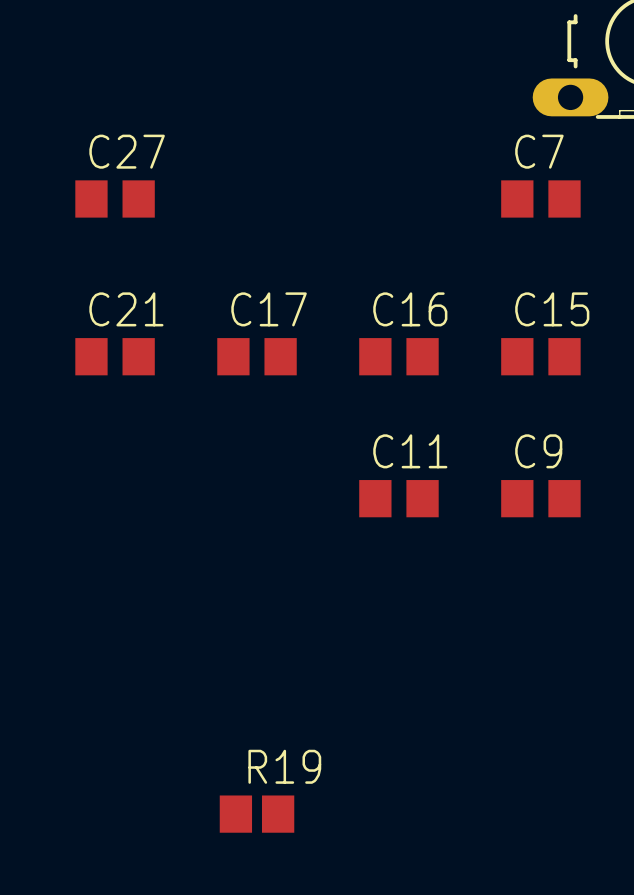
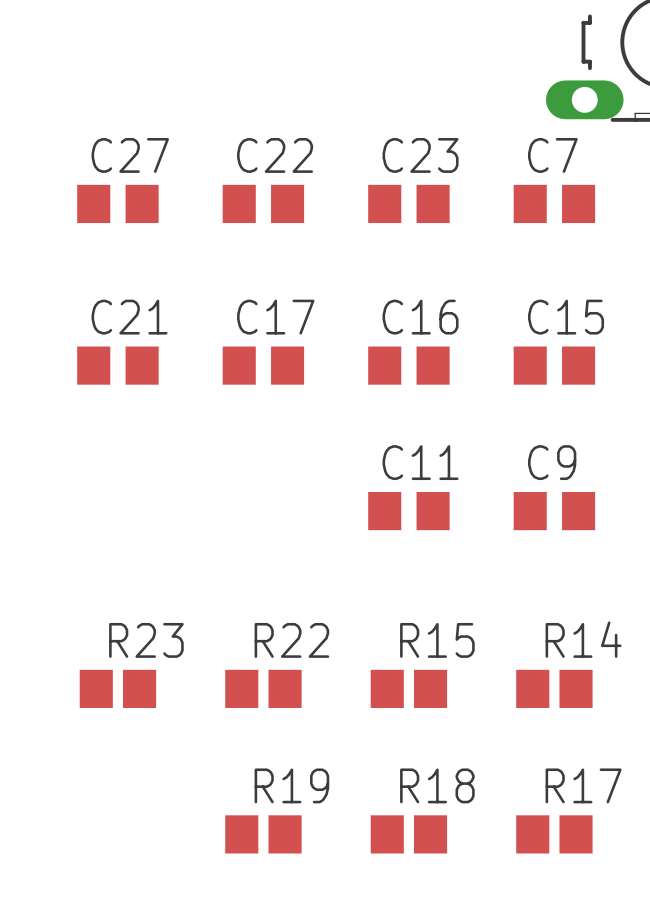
C22: none -> (263, 203)
C23: none -> (408, 203)
R23: none -> (117, 688)
R22: none -> (263, 688)
R15: none -> (408, 688)
R14: none -> (554, 688)
R18: none -> (408, 834)
R17: none -> (554, 834)

